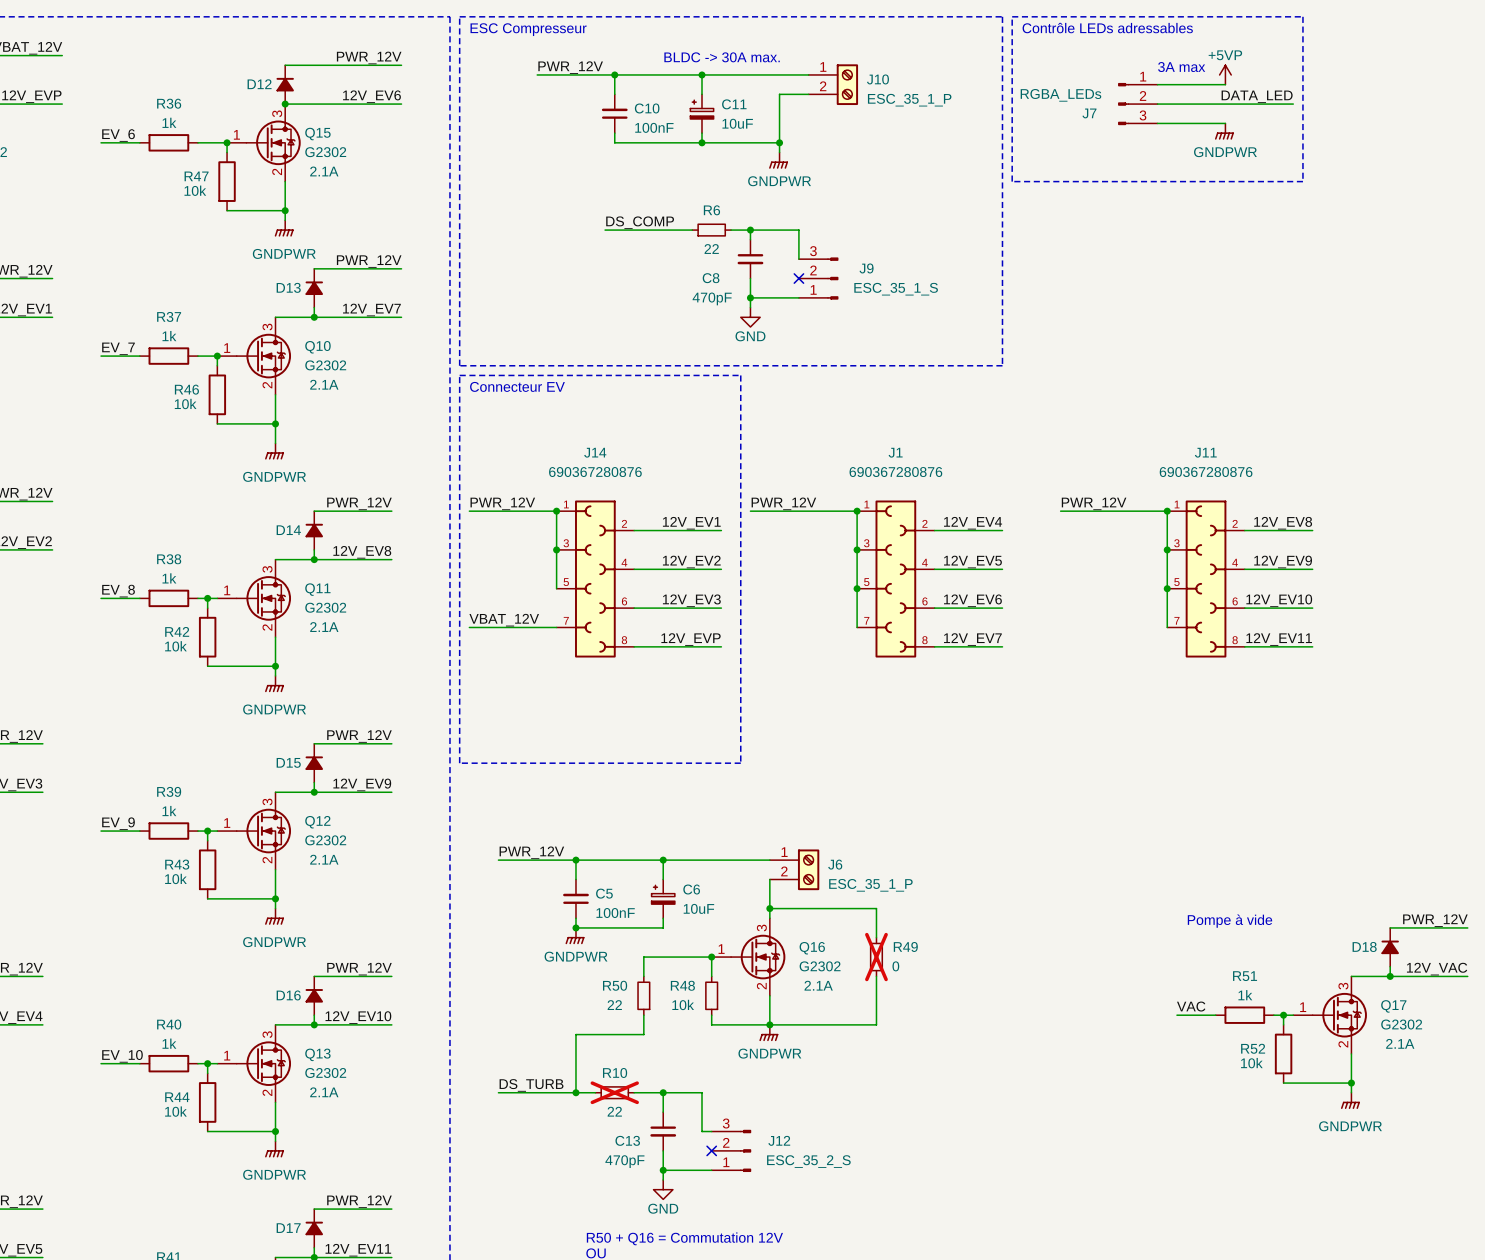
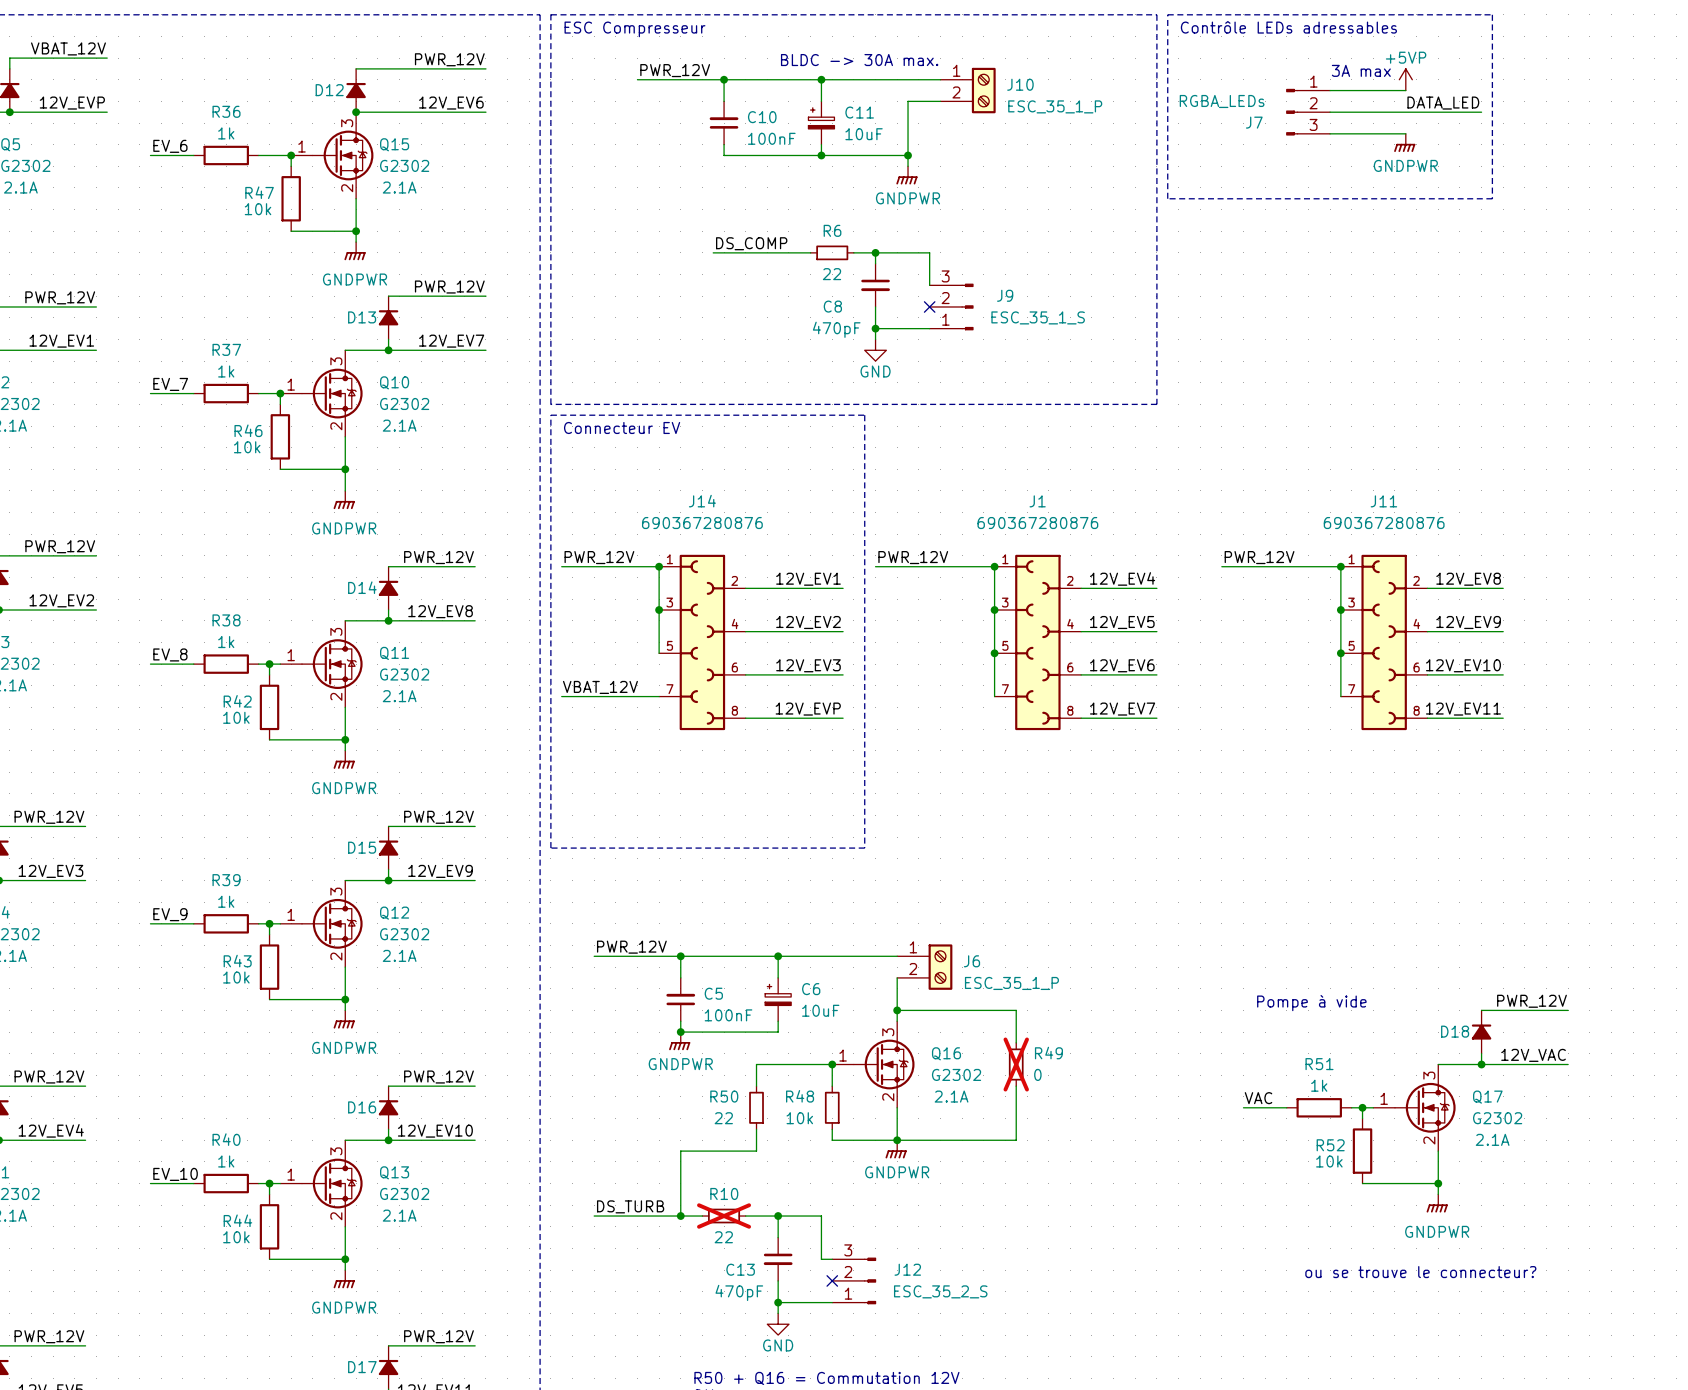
label position: PWR_12V (1435, 920) -> PWR_12V (1531, 1001)
text position: Pompe à vide (1229, 921) -> Pompe à vide (1311, 1003)
wire: (1390, 927) (1467, 927) -> (1481, 1010) (1568, 1010)
D18 position: (1390, 947) -> (1481, 1032)
junction: none -> (1481, 1064)
wire: (1390, 966) (1390, 976) -> (1481, 1053) (1481, 1064)
label position: 12V_VAC (1437, 969) -> 12V_VAC (1533, 1055)
wire: (1351, 976) (1467, 976) -> (1438, 1064) (1568, 1064)
junction: (1390, 976) -> none
junction: none -> (1362, 1107)
label position: VAC (1191, 1006) -> VAC (1258, 1098)
wire: (1176, 1015) (1215, 1015) -> (1243, 1107) (1286, 1107)
R51 position: (1244, 1015) -> (1319, 1107)
wire: (1273, 1015) (1293, 1015) -> (1351, 1107) (1373, 1107)
wire: (1283, 1015) (1283, 1024) -> (1362, 1107) (1362, 1118)
junction: (1283, 1015) -> none
Q17 position: (1330, 1015) -> (1414, 1107)
R52 position: (1283, 1053) -> (1362, 1151)
wire: (1351, 1053) (1351, 1092) -> (1438, 1151) (1438, 1194)
junction: none -> (1438, 1183)
wire: (1283, 1083) (1351, 1083) -> (1362, 1183) (1438, 1183)
junction: (1351, 1083) -> none
power symbol position: GNDPWR (1350, 1100) -> GNDPWR (1437, 1203)
text: none -> ou se trouve le connecteur? (1420, 1272)

